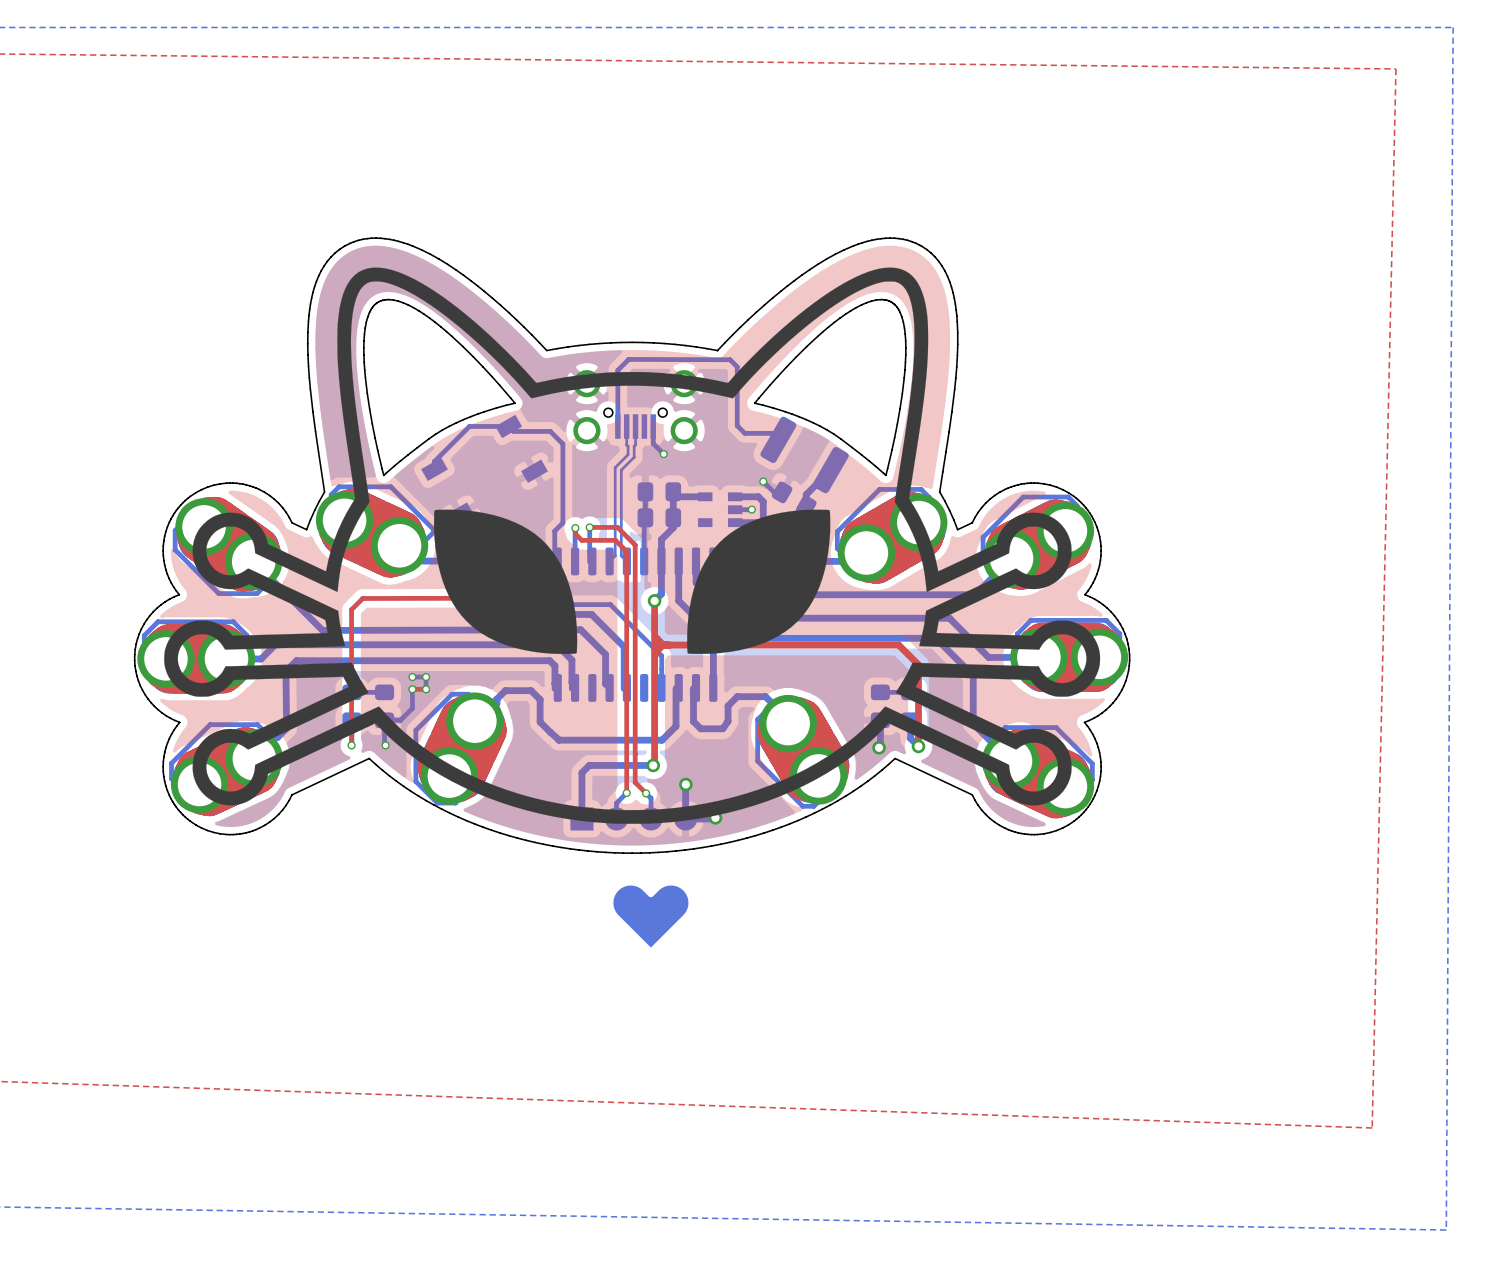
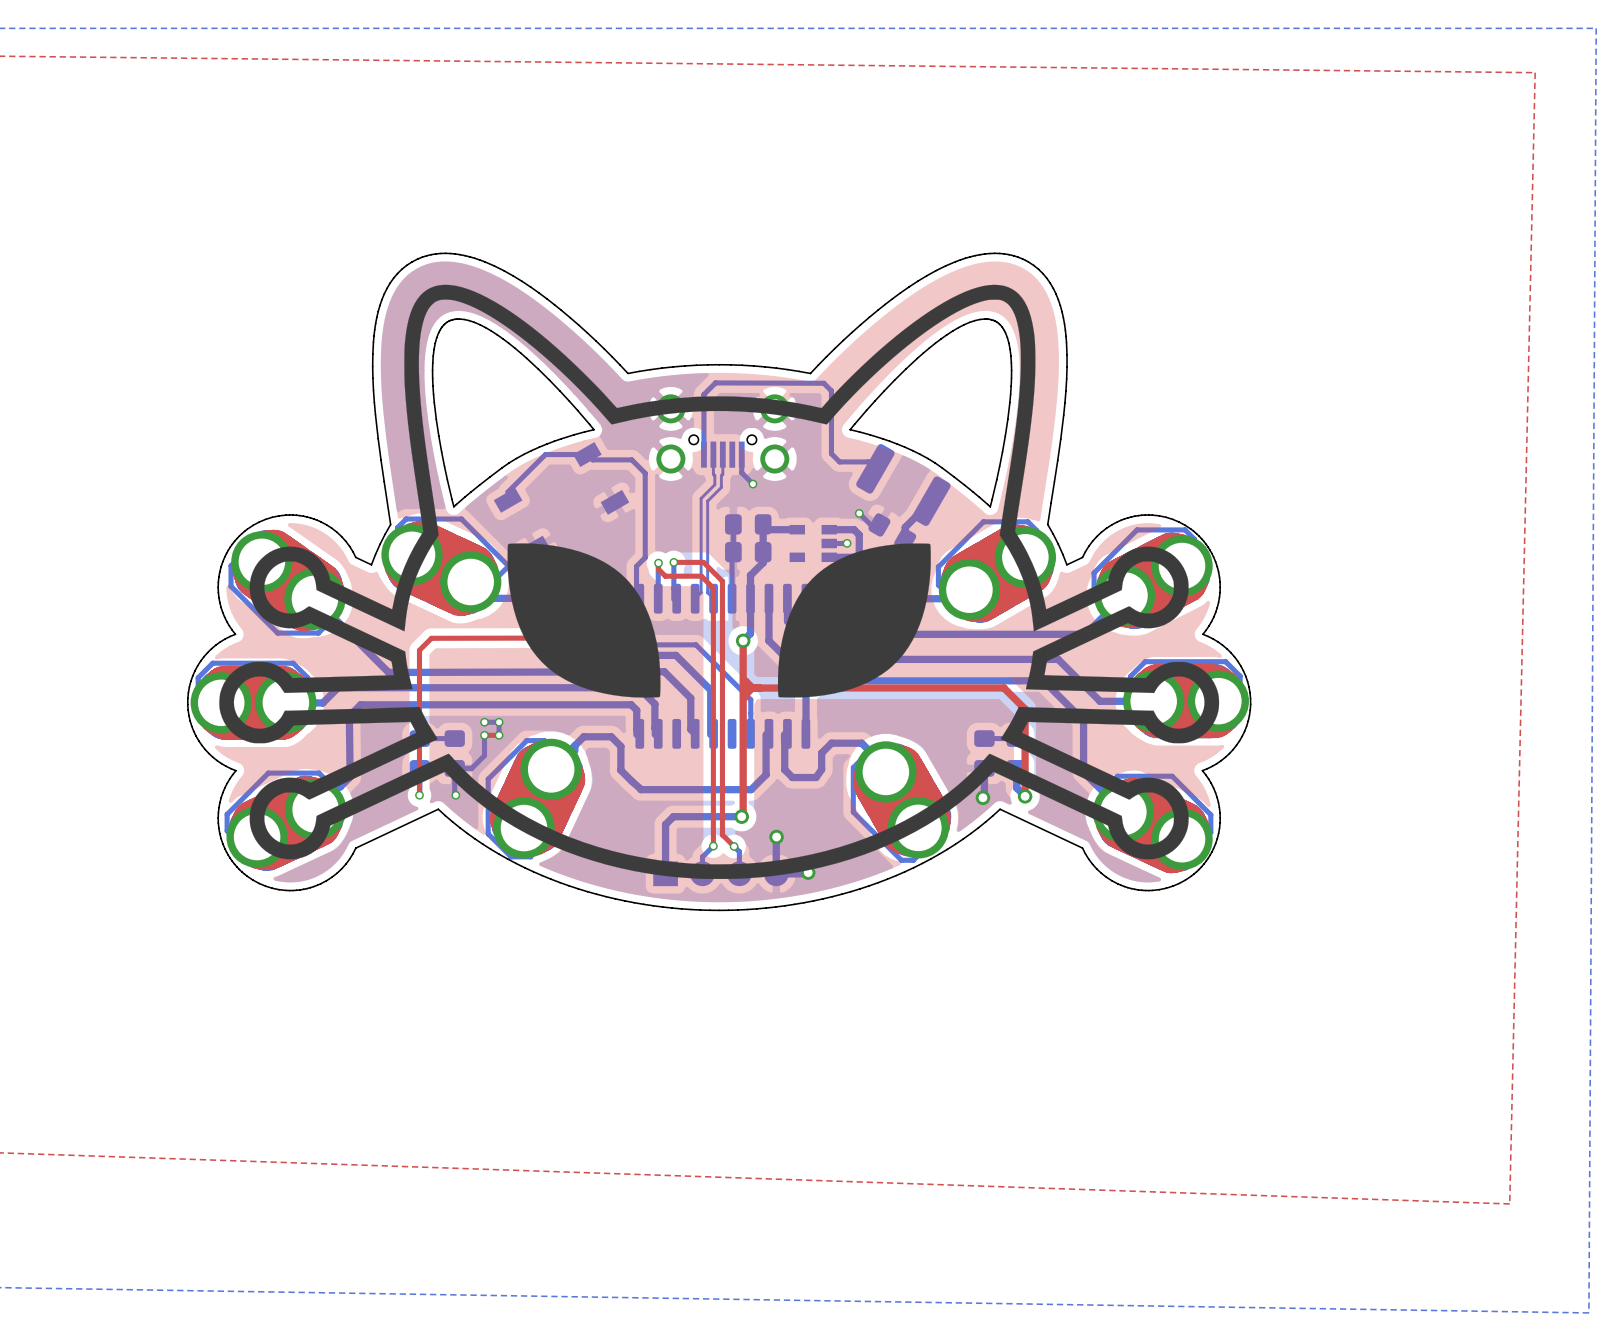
drawing: [613, 885, 689, 948] -> none

